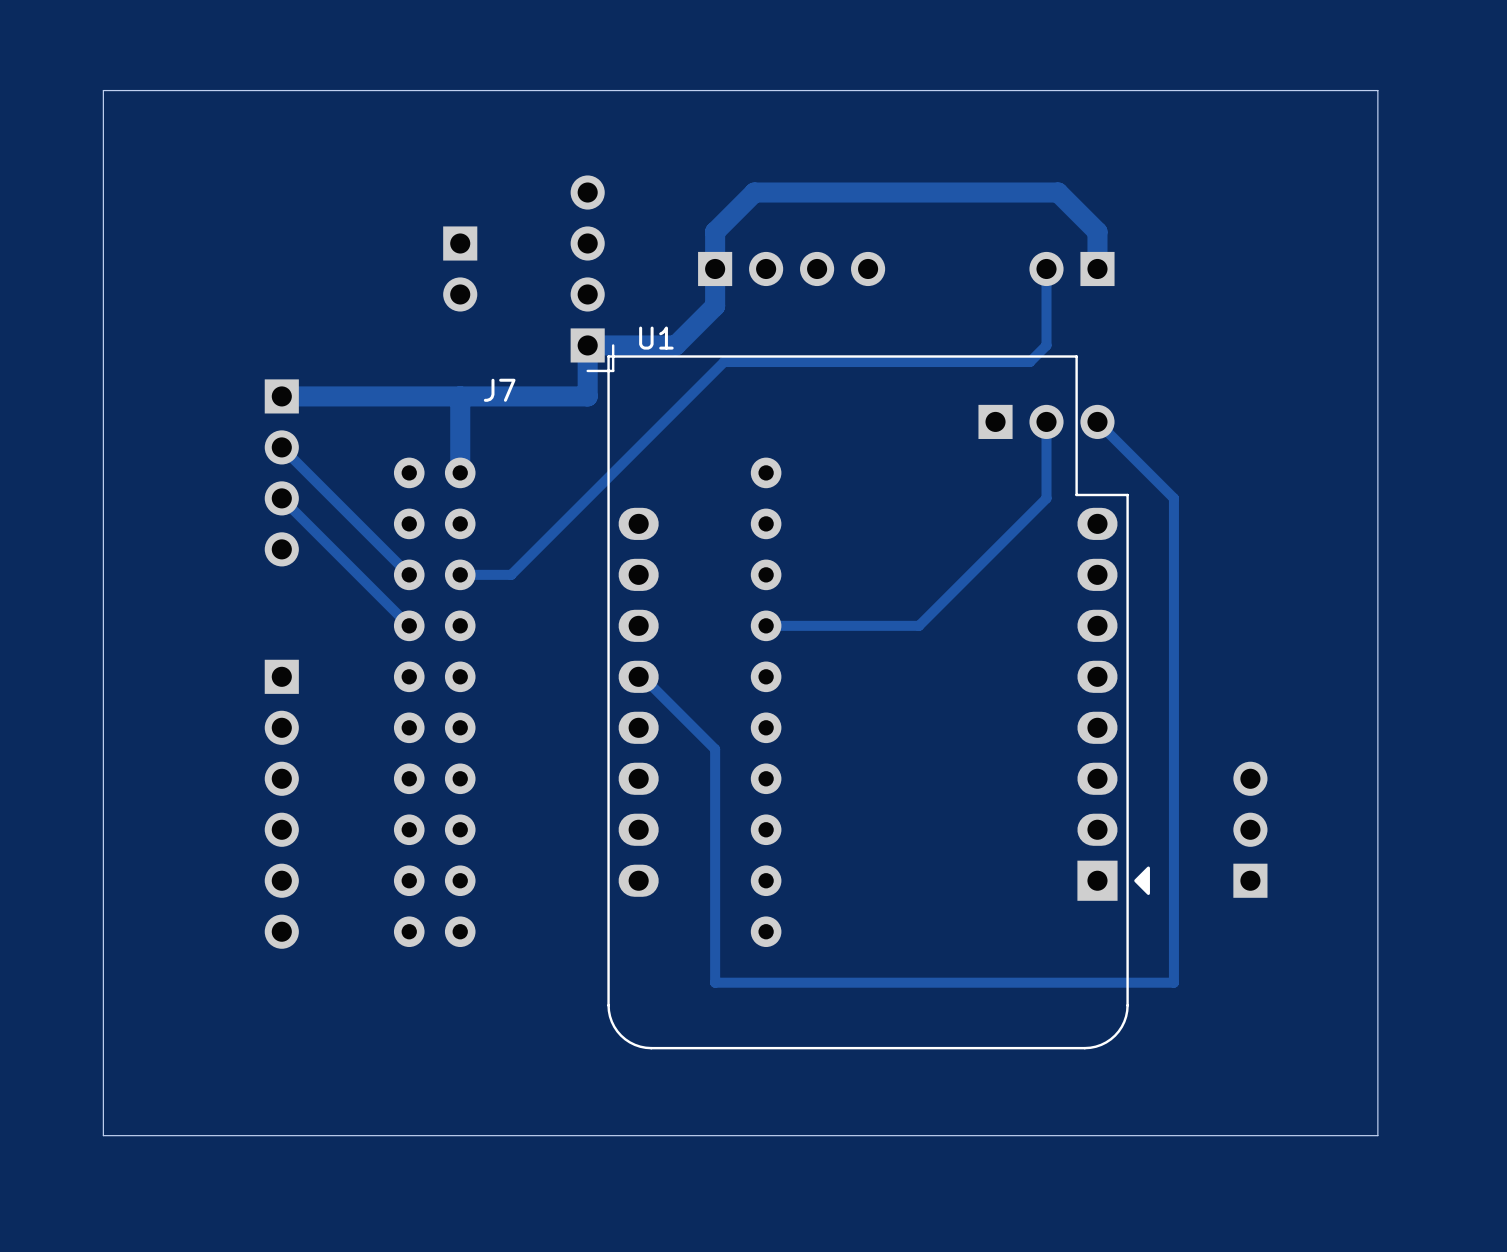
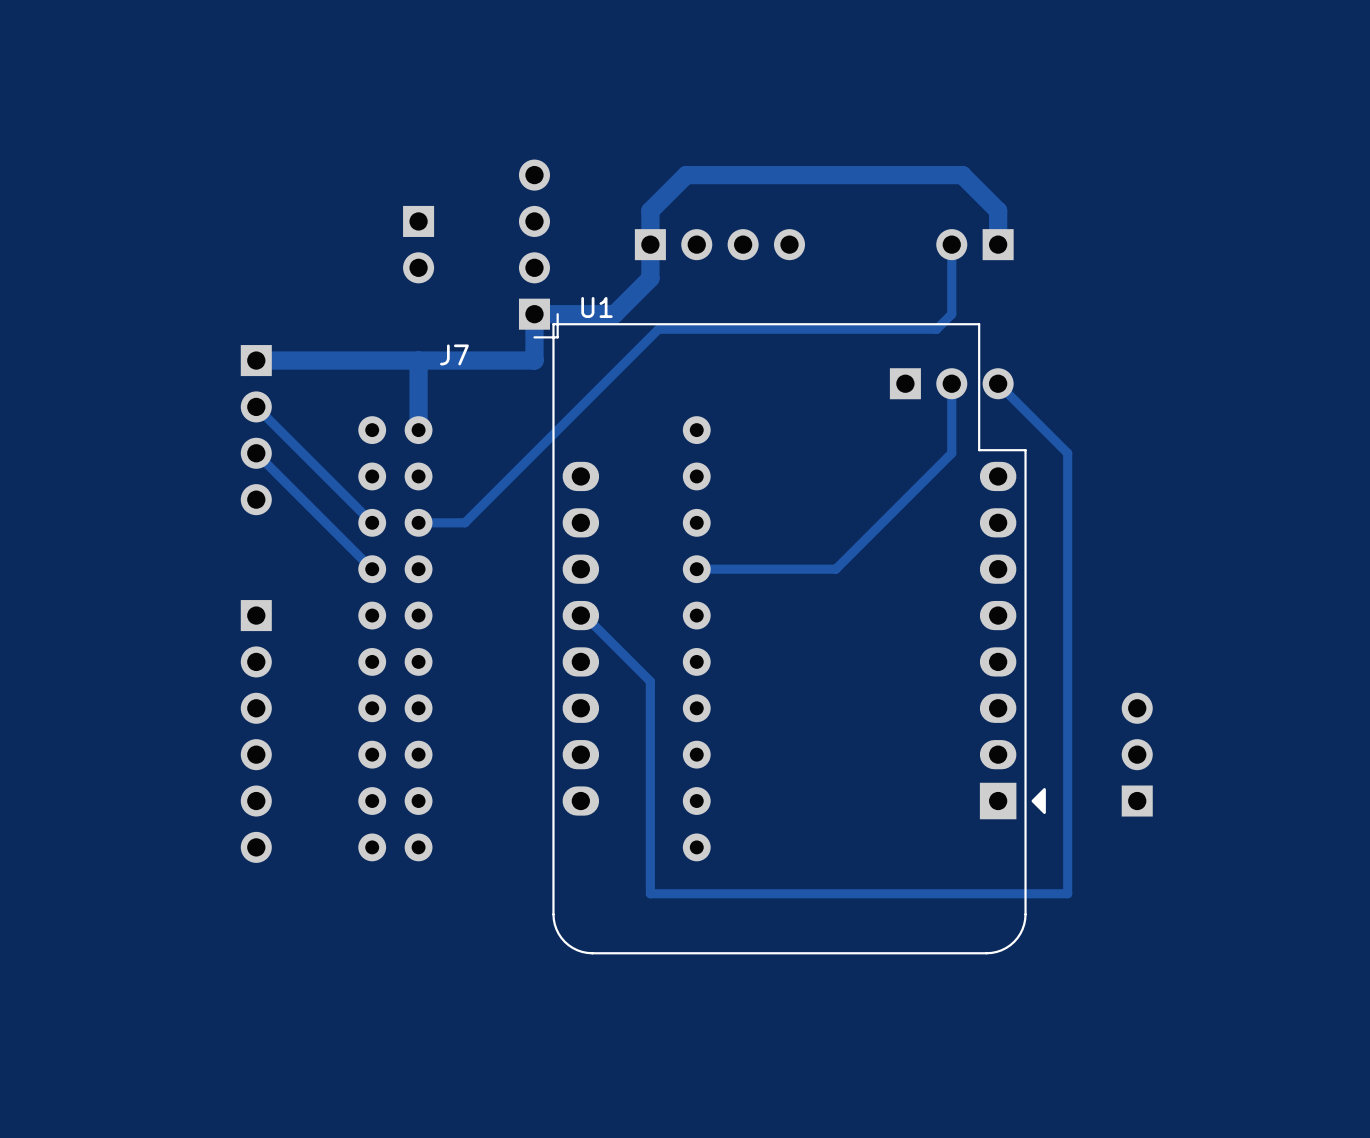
board edge: (1377, 90) (103, 90) (103, 1135) (1377, 1135) (1377, 90) -> none

